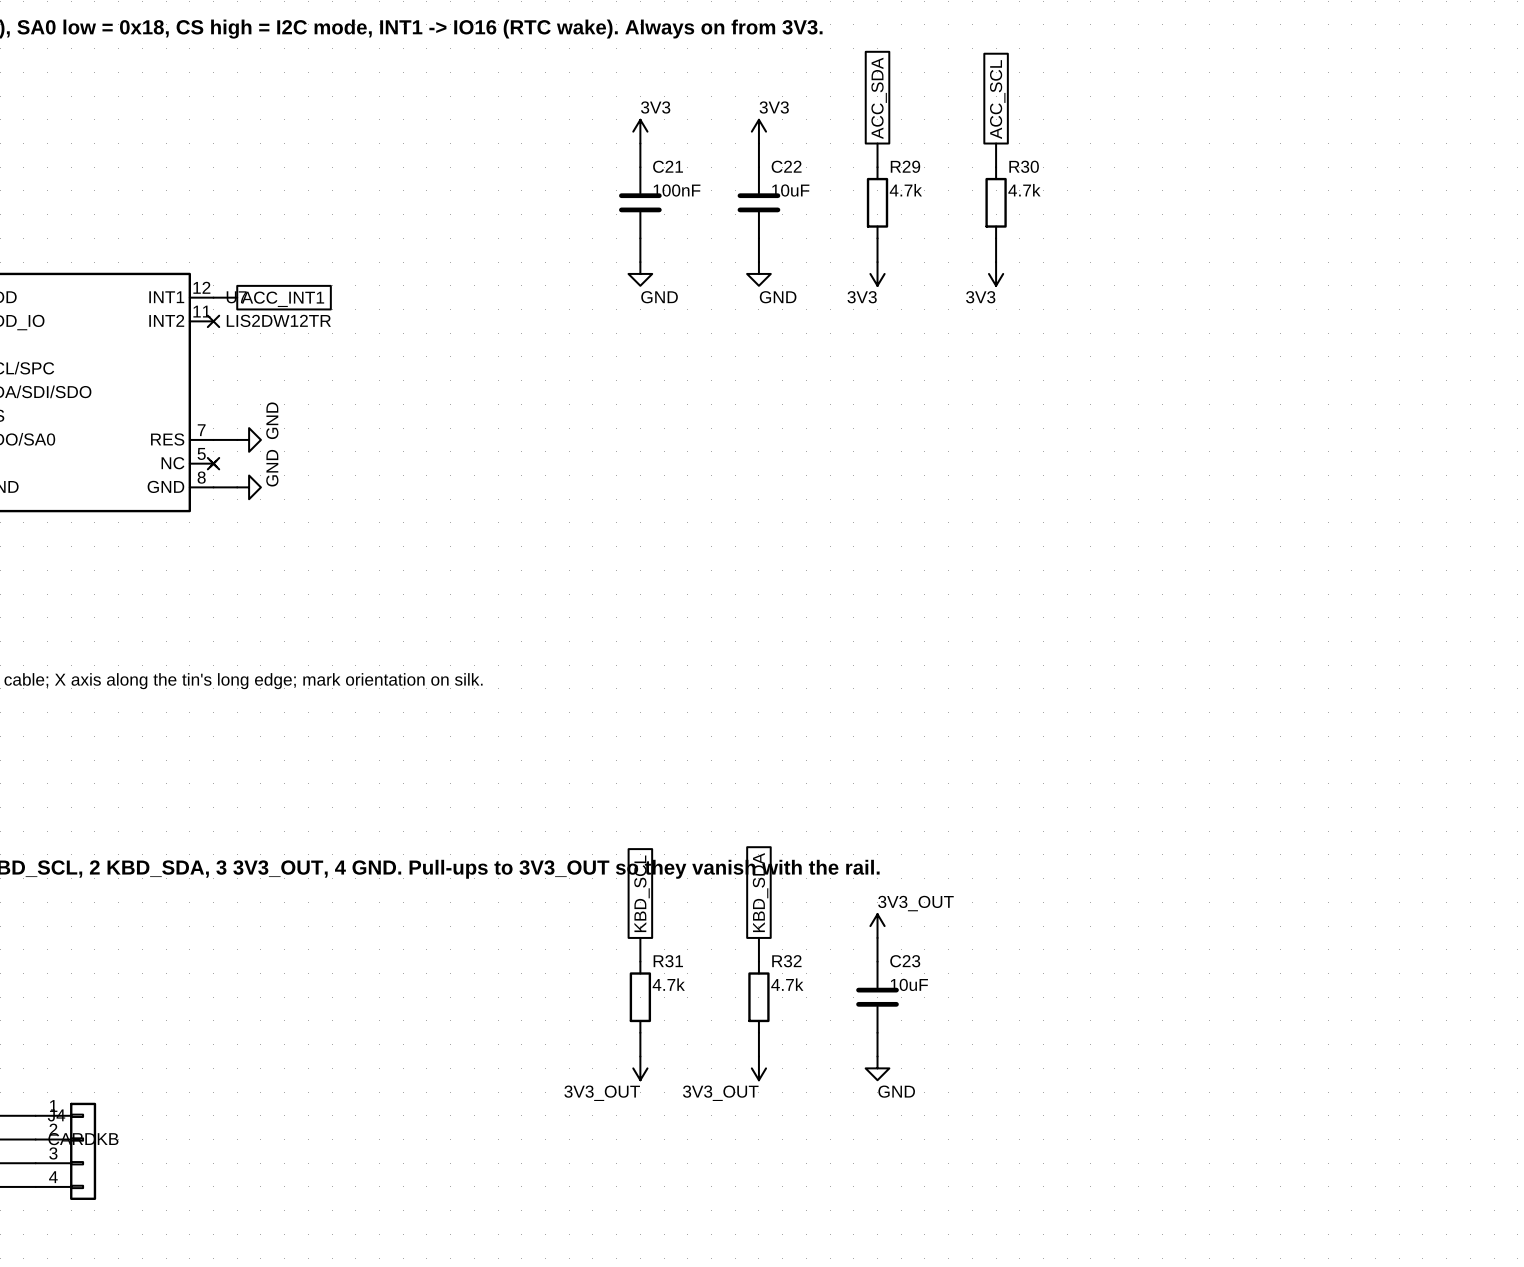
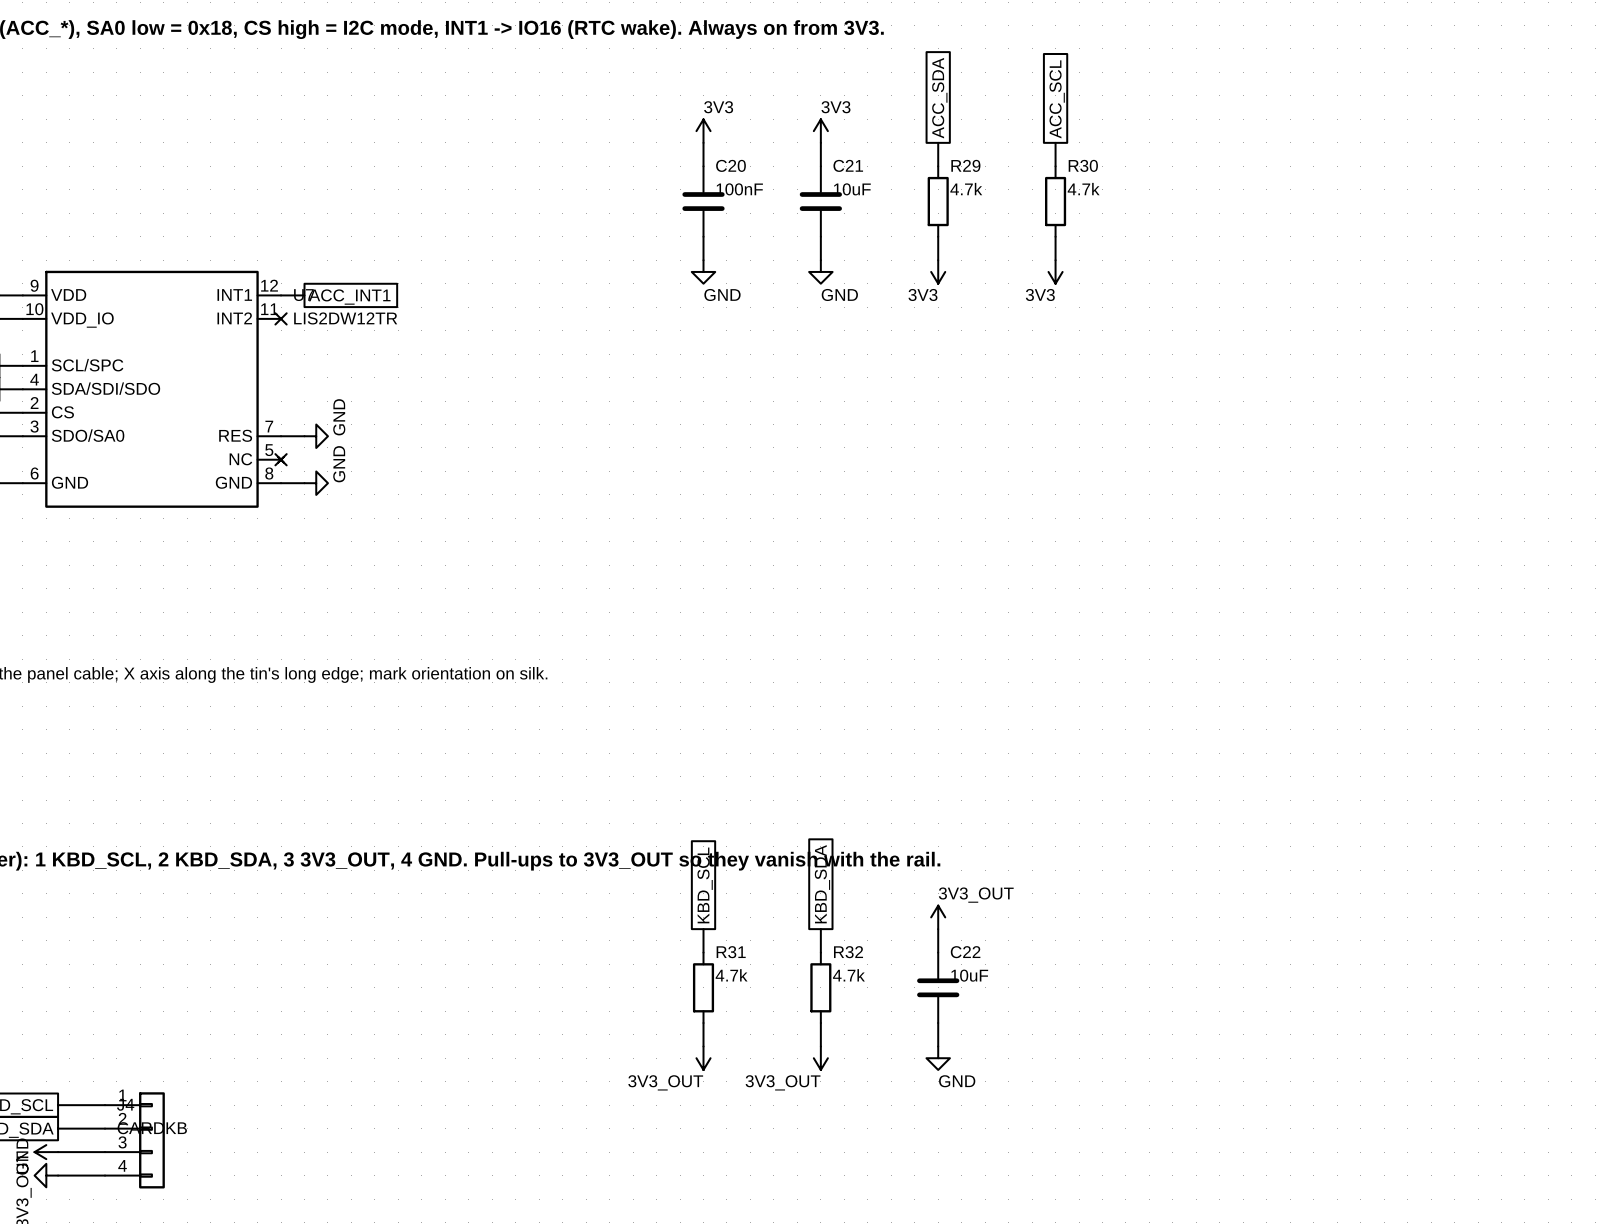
C21 name: C21 (668, 166) -> C20 (730, 165)
C22 name: C22 (786, 166) -> C21 (848, 165)
C23 name: C23 (905, 961) -> C22 (965, 952)

